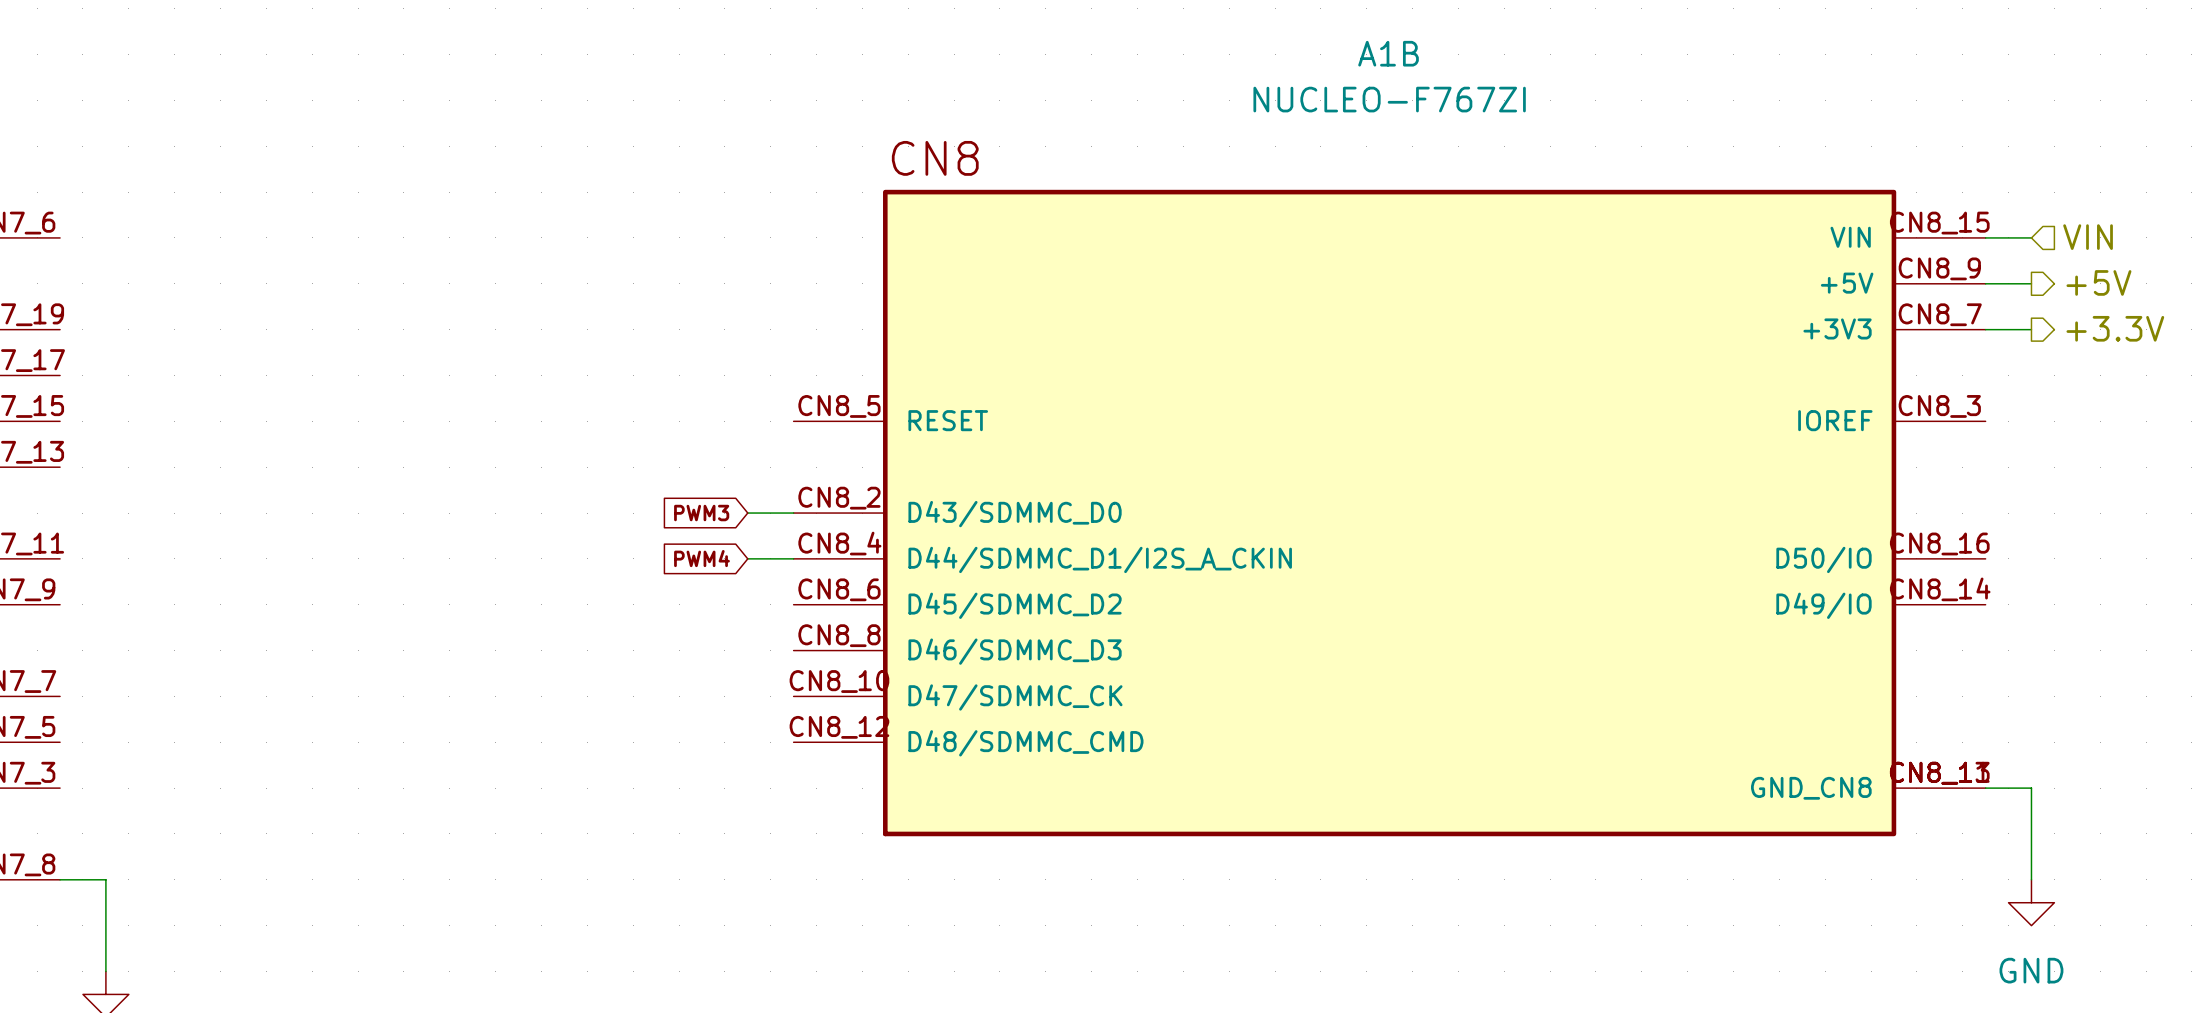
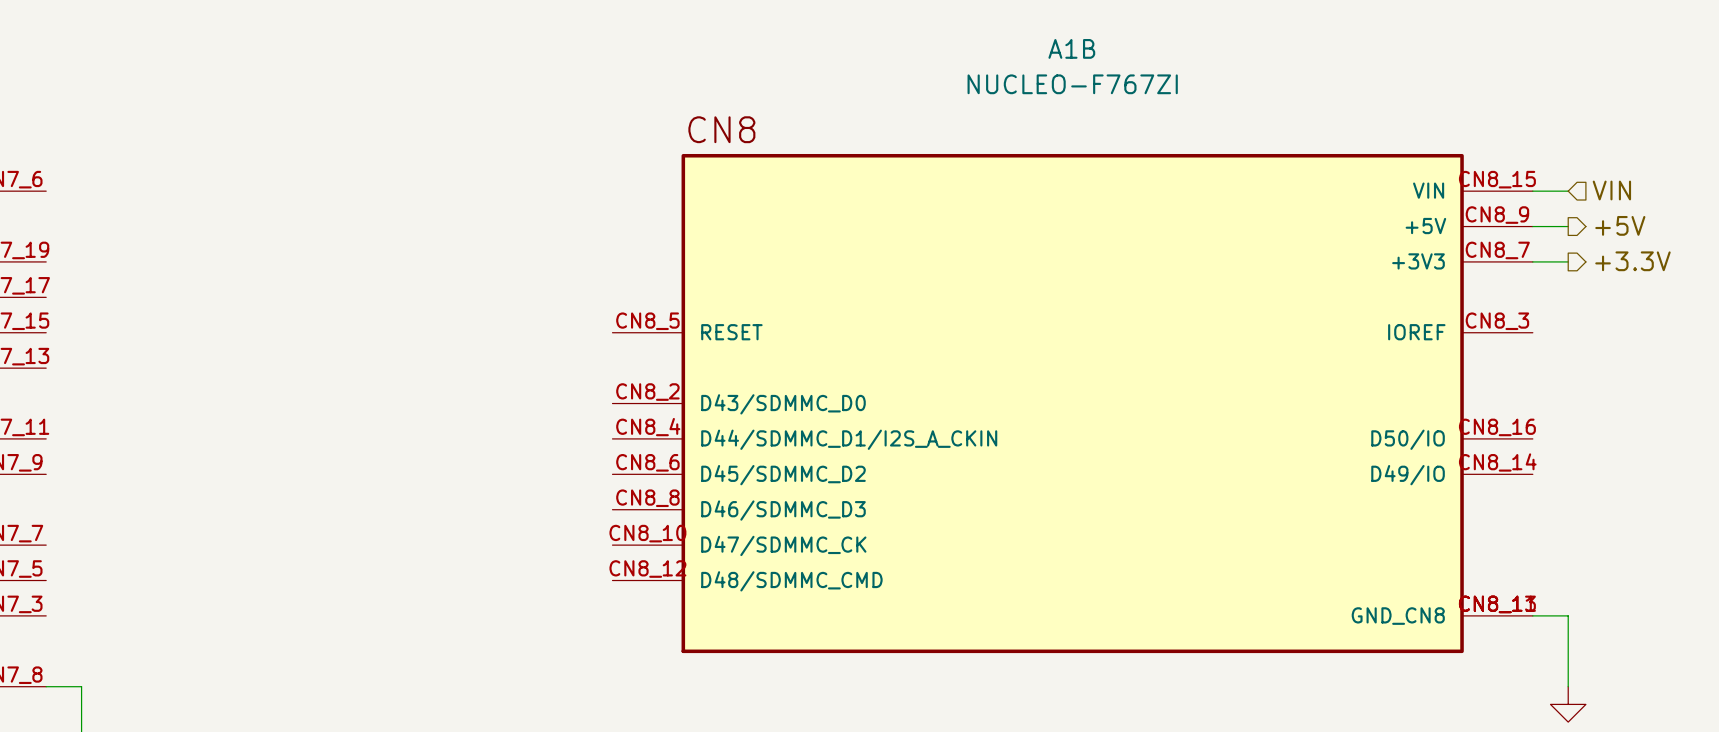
global label: PWM3 (701, 513) -> none
wire: (747, 513) (793, 513) -> none
global label: PWM4 (701, 558) -> none
wire: (747, 558) (793, 558) -> none

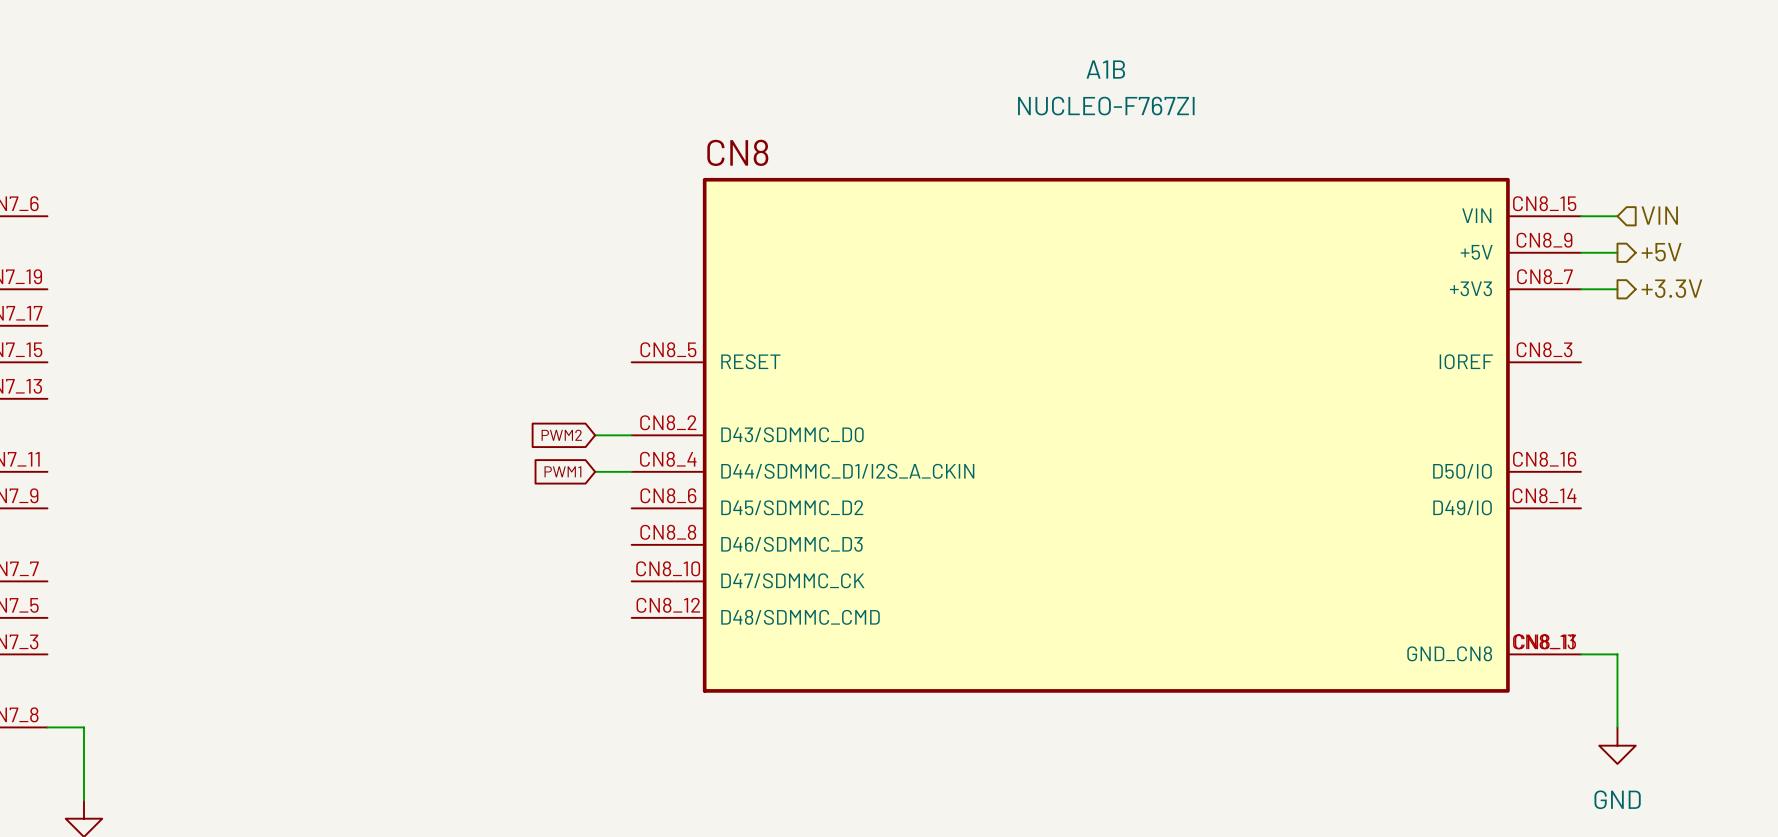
global label: none -> PWM2 (561, 435)
wire: none -> (595, 435) (631, 435)
global label: none -> PWM1 (562, 471)
wire: none -> (595, 471) (631, 471)

